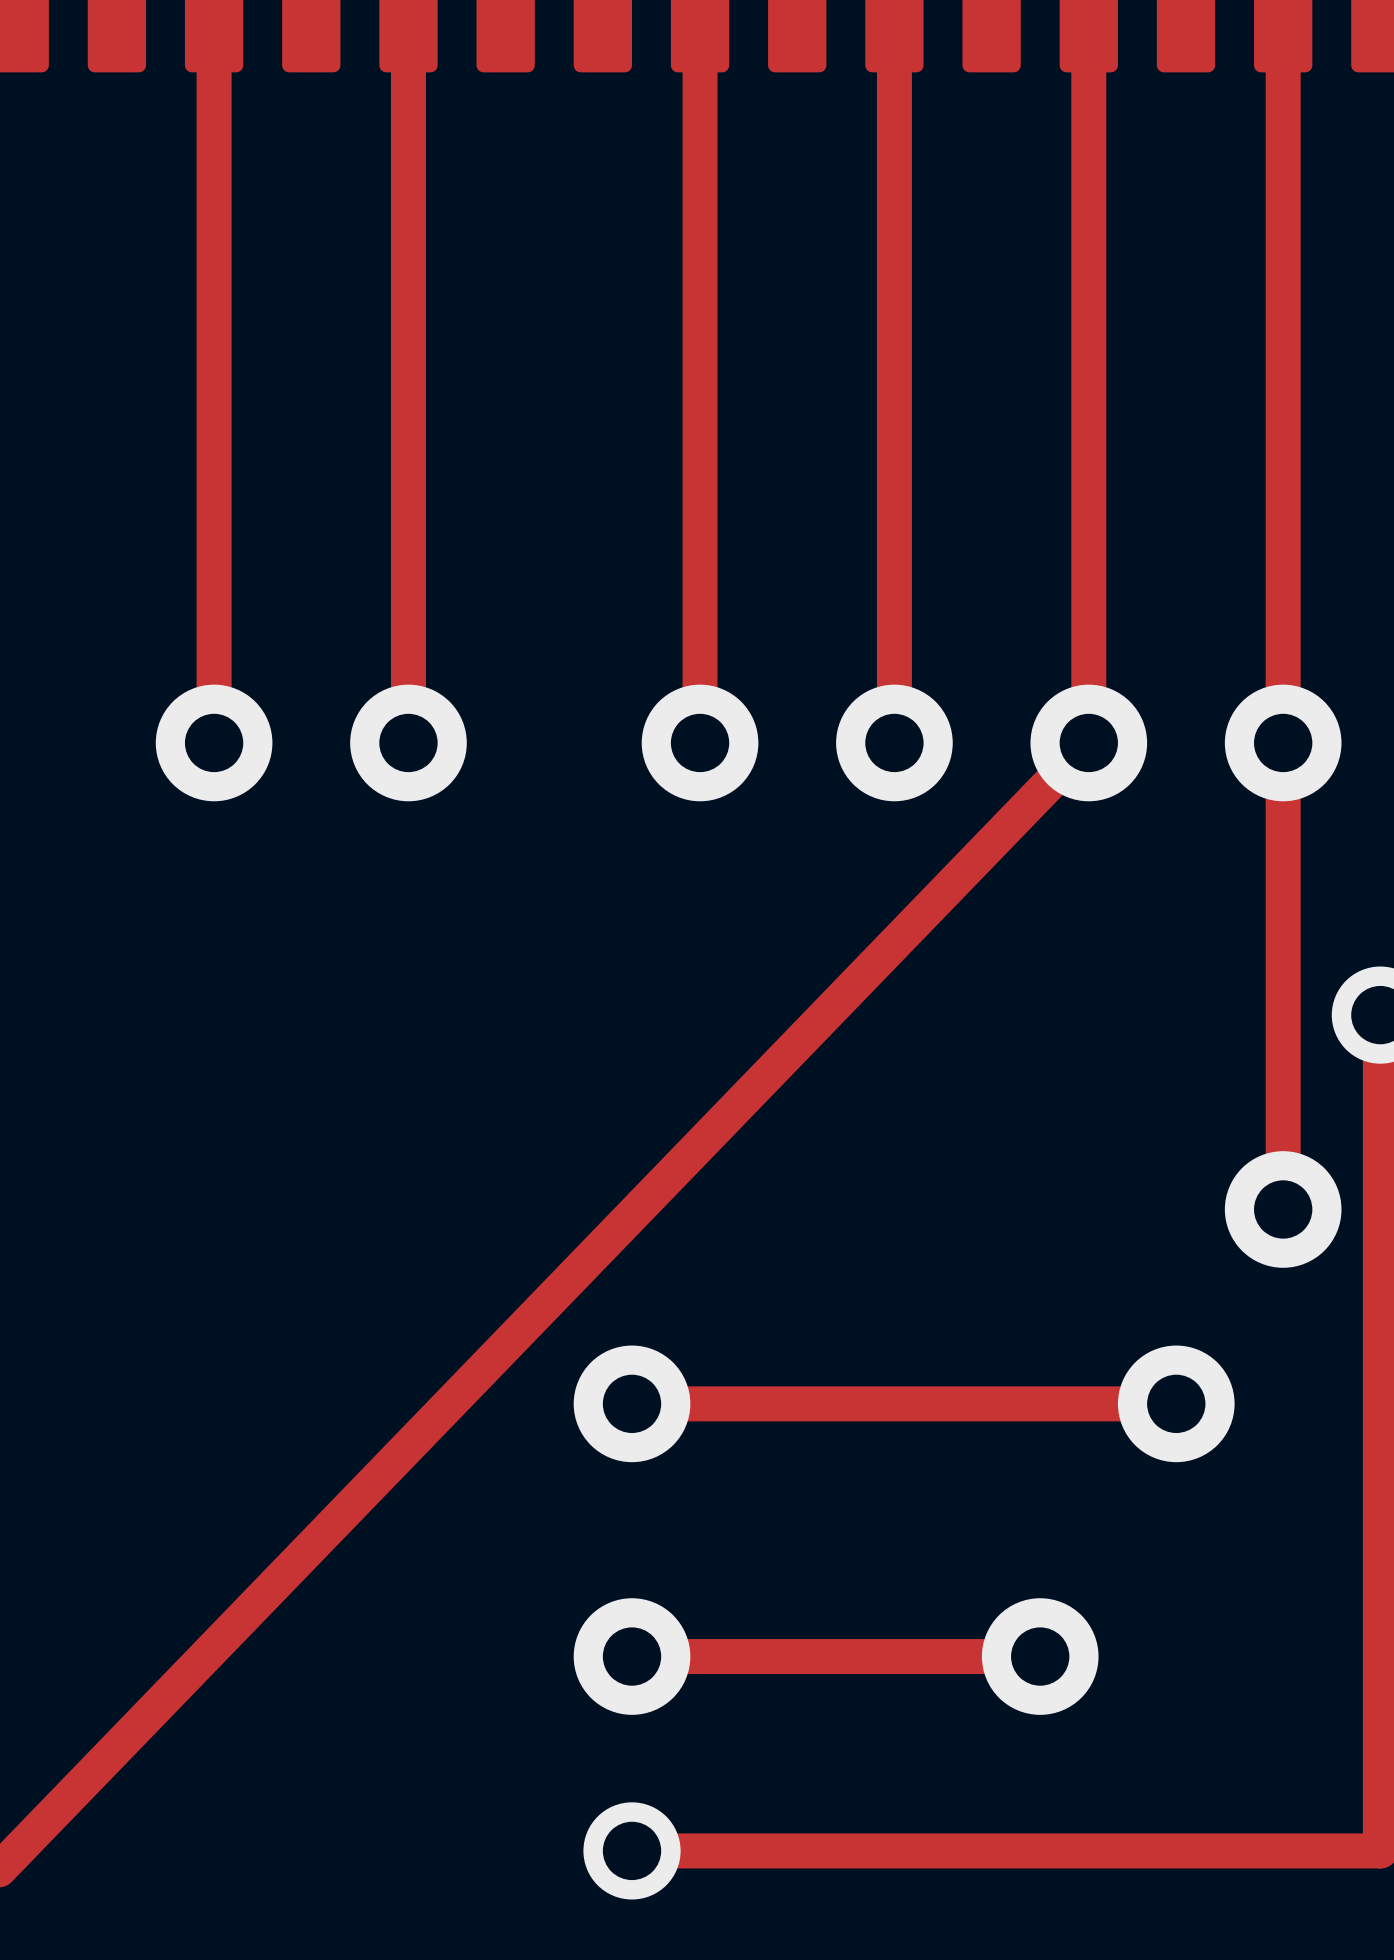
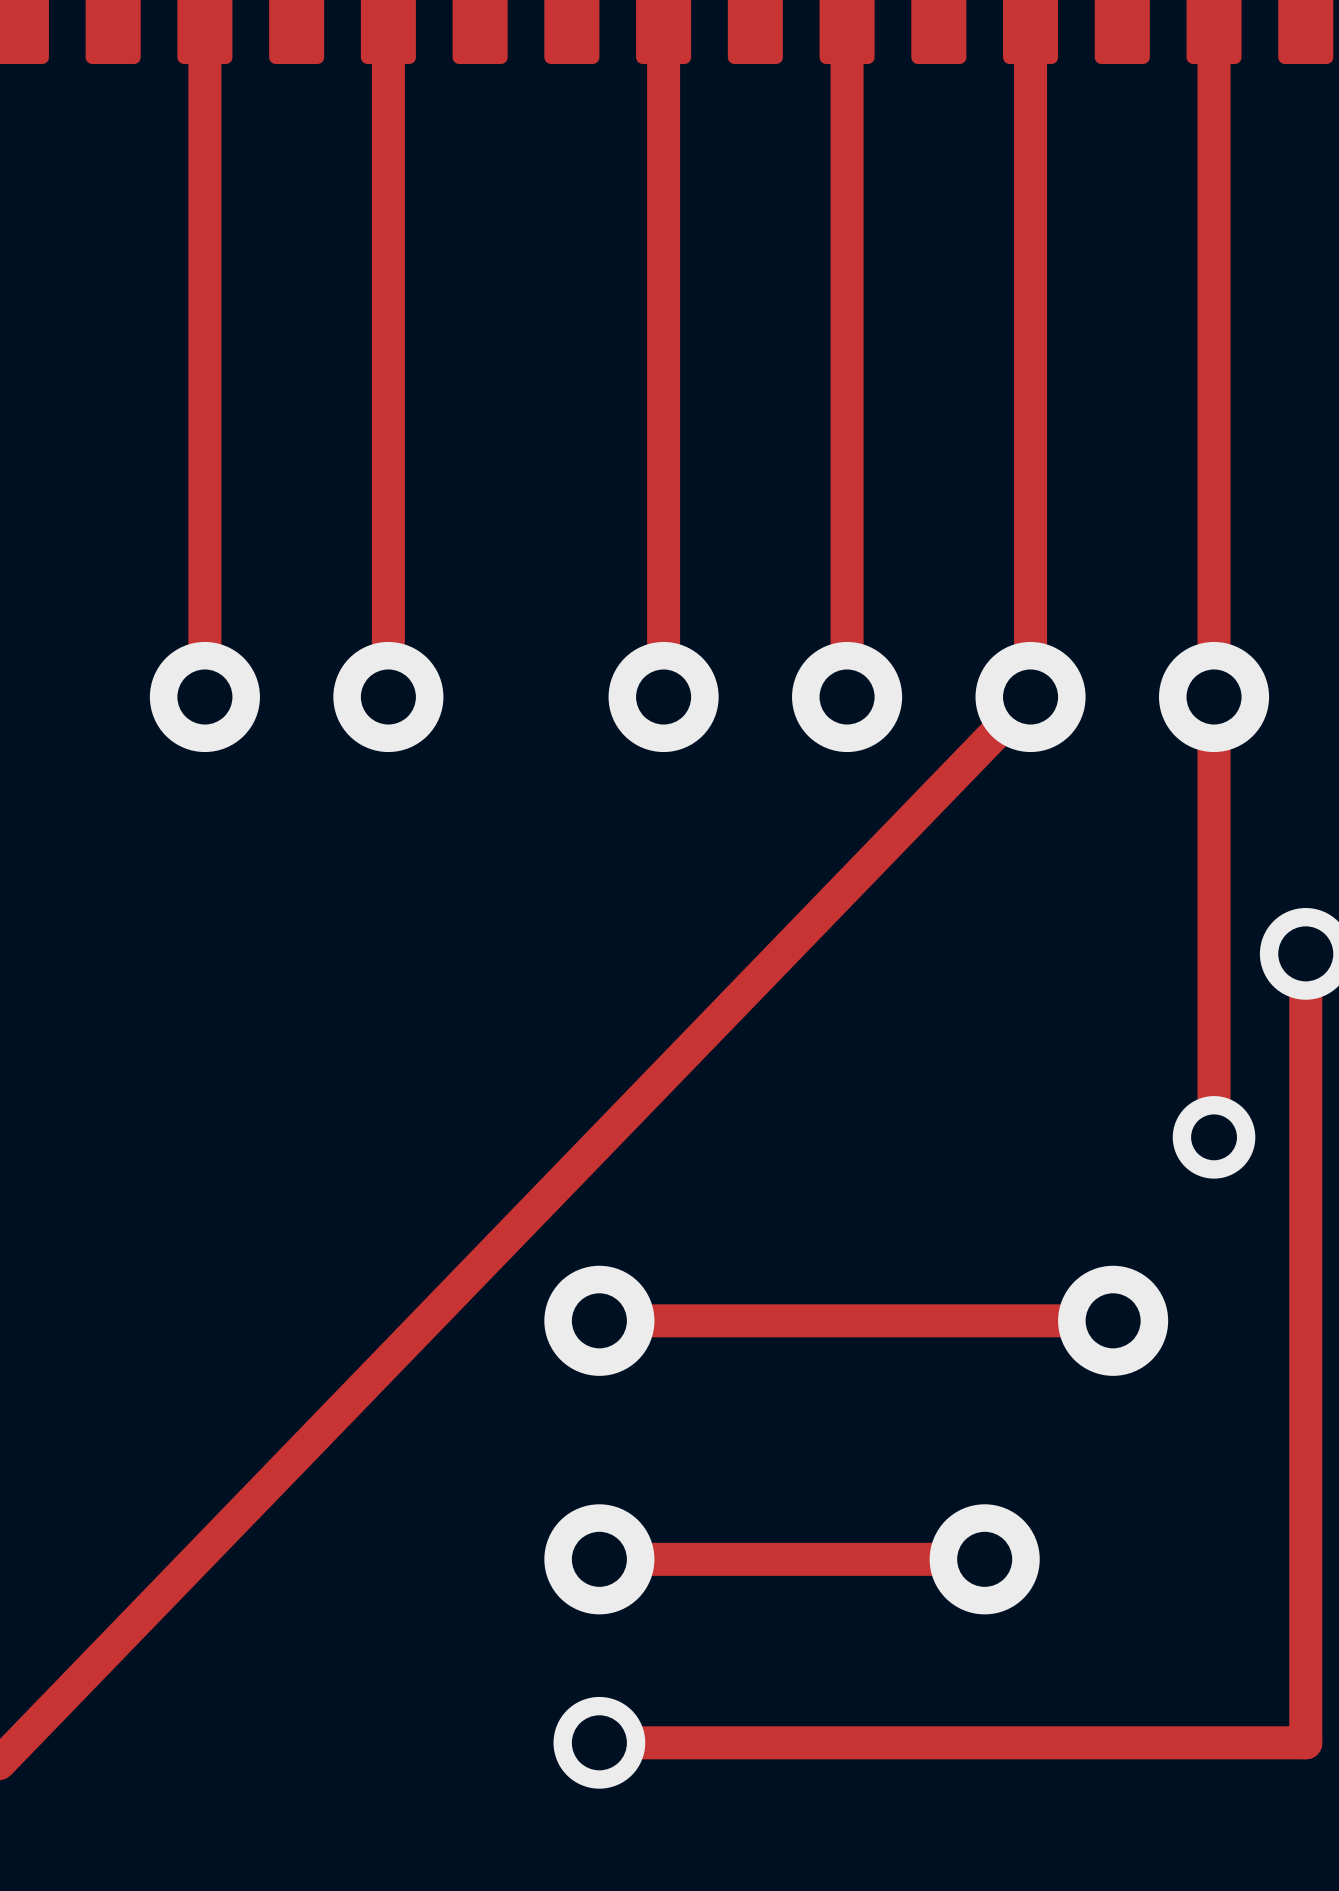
via size: [1224, 1151, 1342, 1268] -> [1172, 1096, 1256, 1179]

